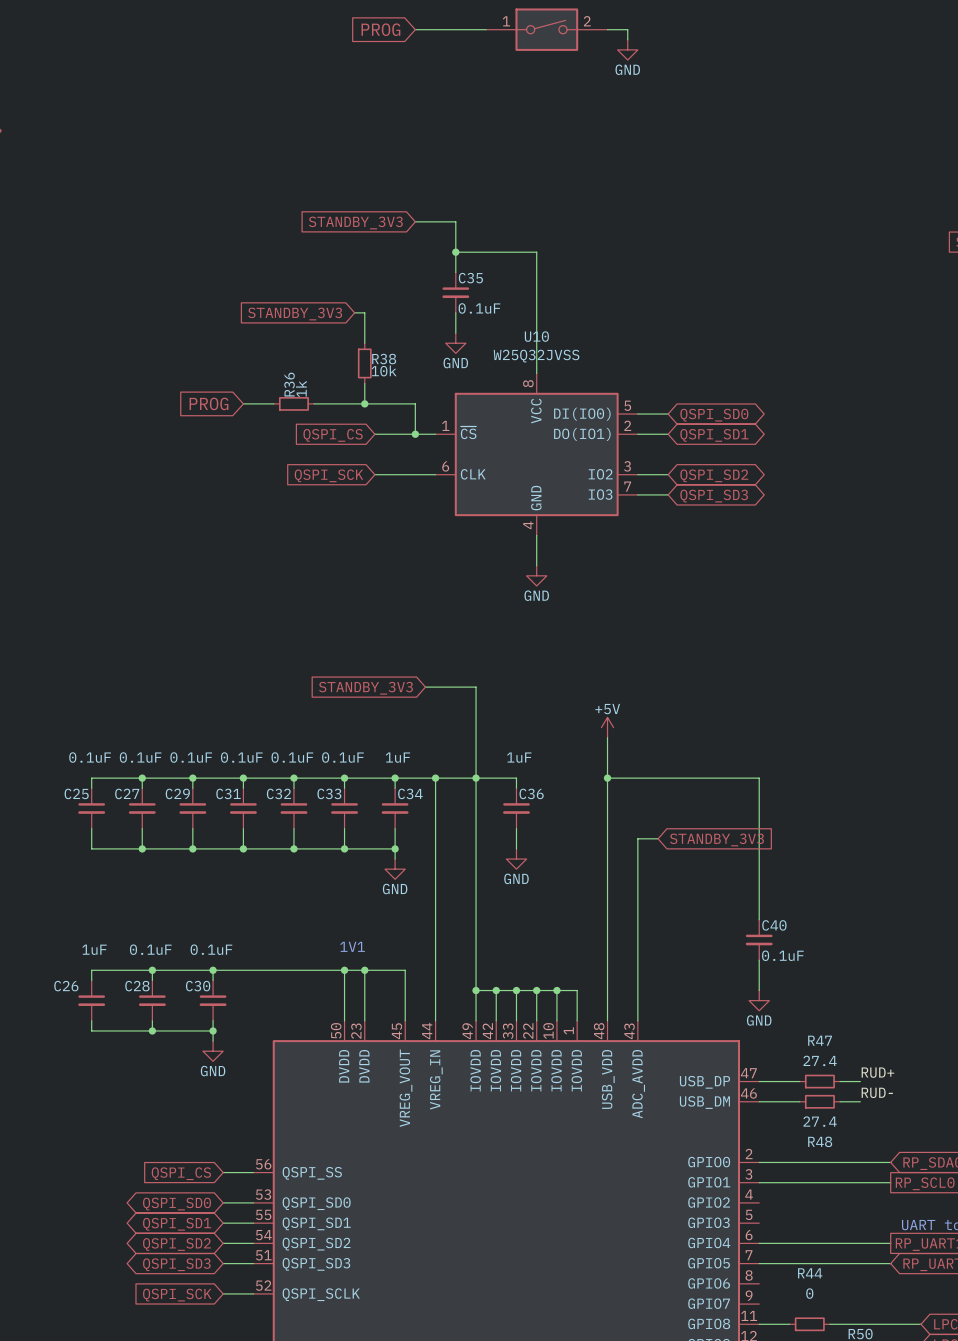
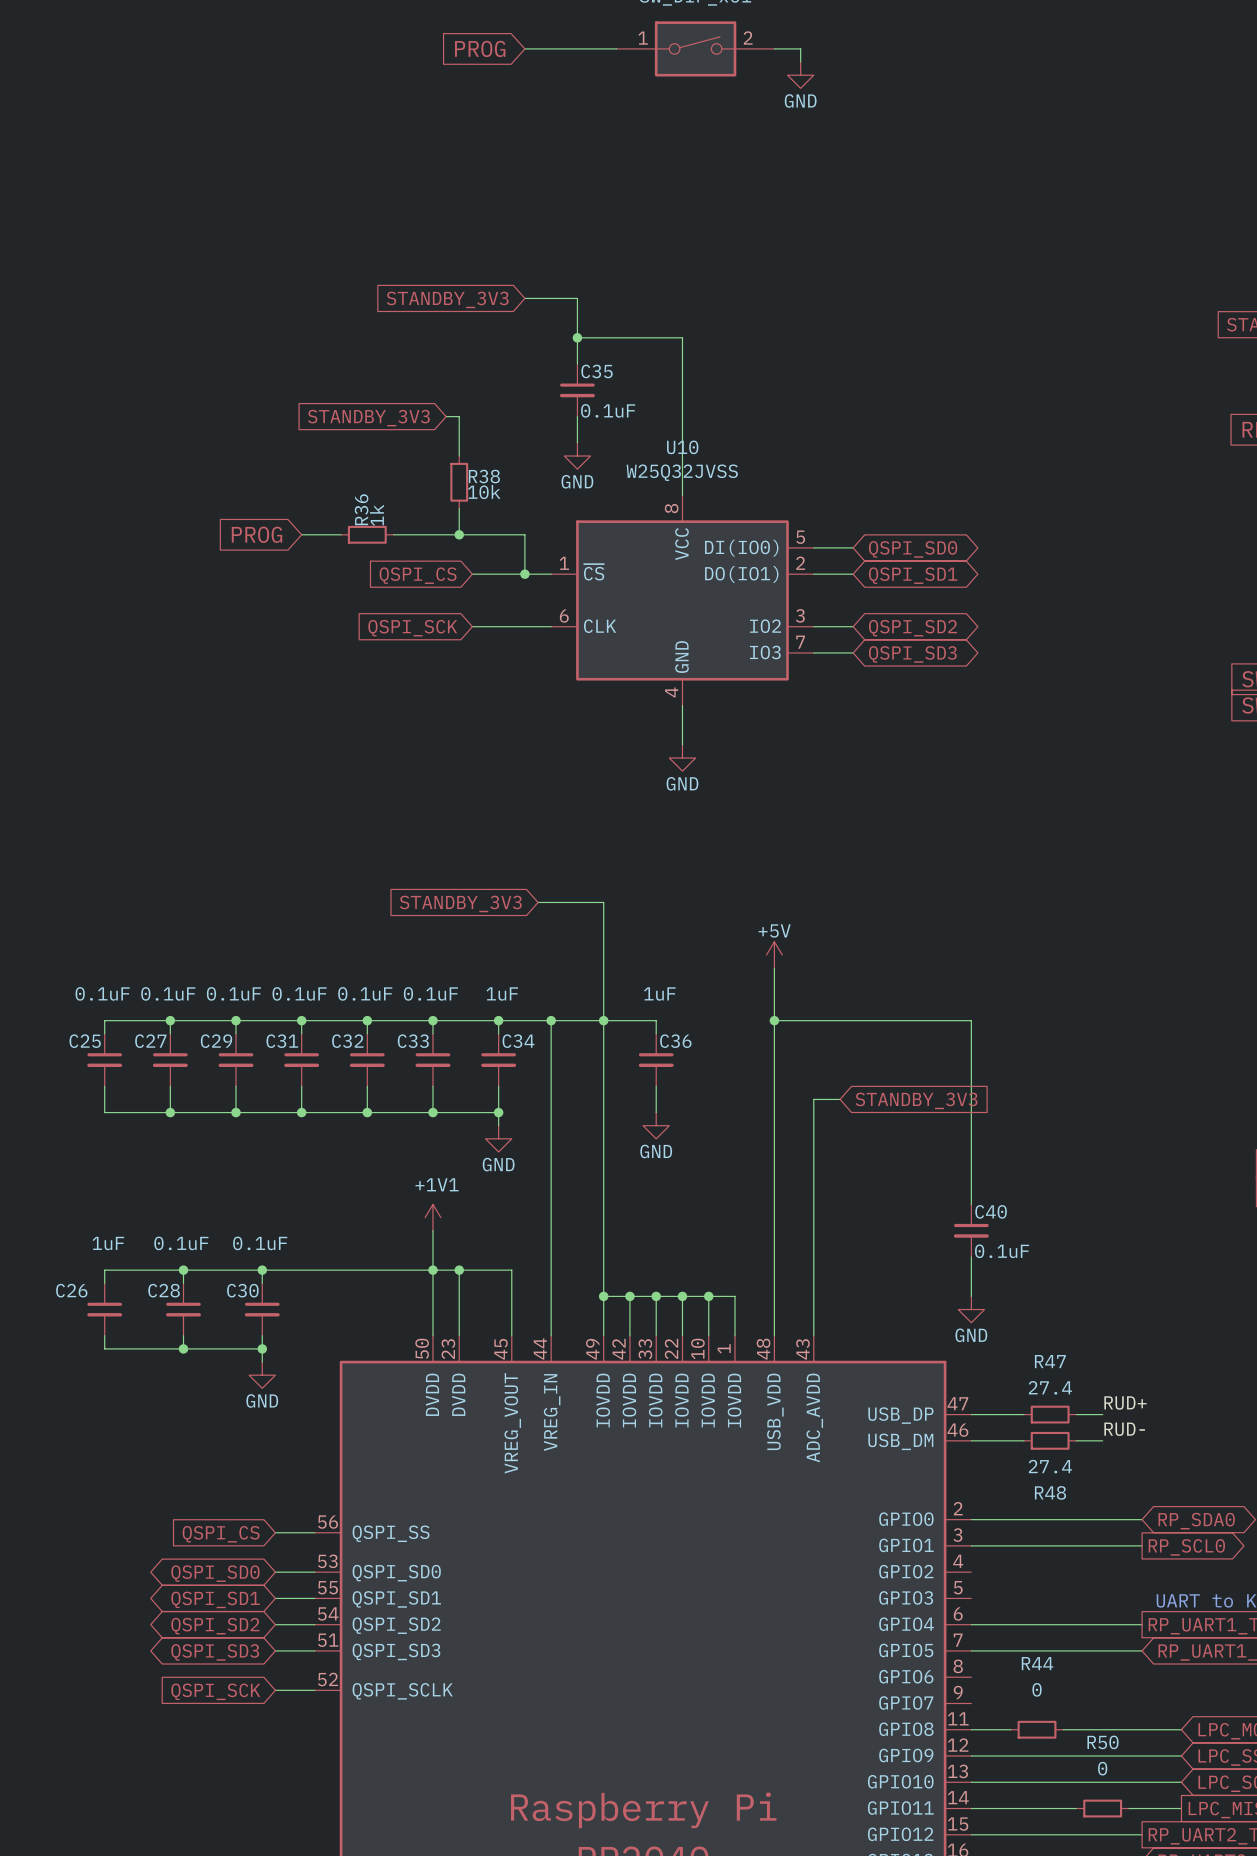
power symbol: none -> +1V1 (432, 1217)
wire: none -> (432, 1230) (432, 1270)
text: 1V1 (352, 946) -> none

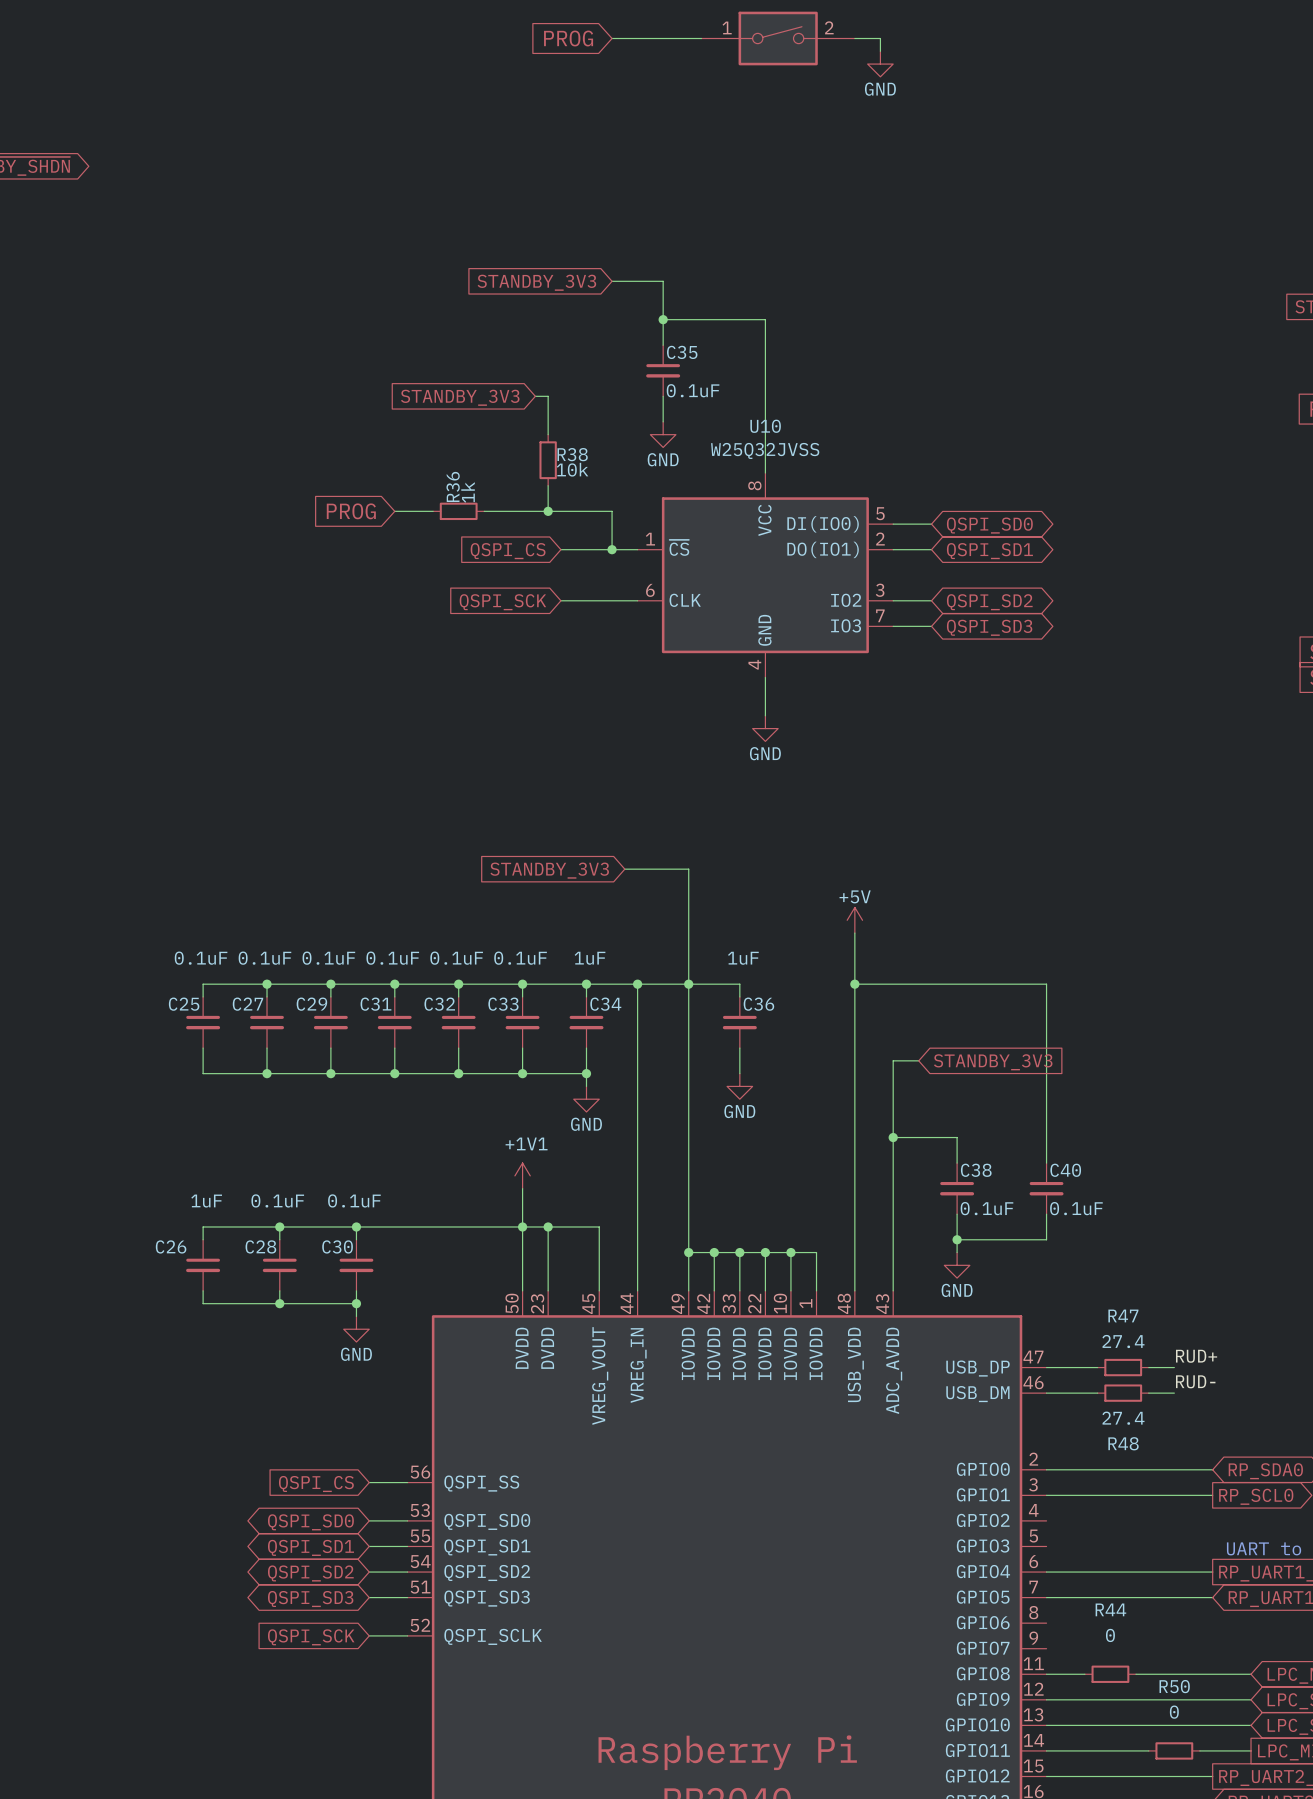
wire: none -> (893, 1137) (957, 1137) (957, 1163)
junction: none -> (893, 1137)
C38: none -> 0.1uF (957, 1188)
wire: none -> (957, 1214) (957, 1252)
junction: none -> (957, 1239)
wire: (971, 1283) (971, 1296) -> (1046, 1239) (957, 1239)
power symbol position: GND (971, 1309) -> GND (957, 1265)

